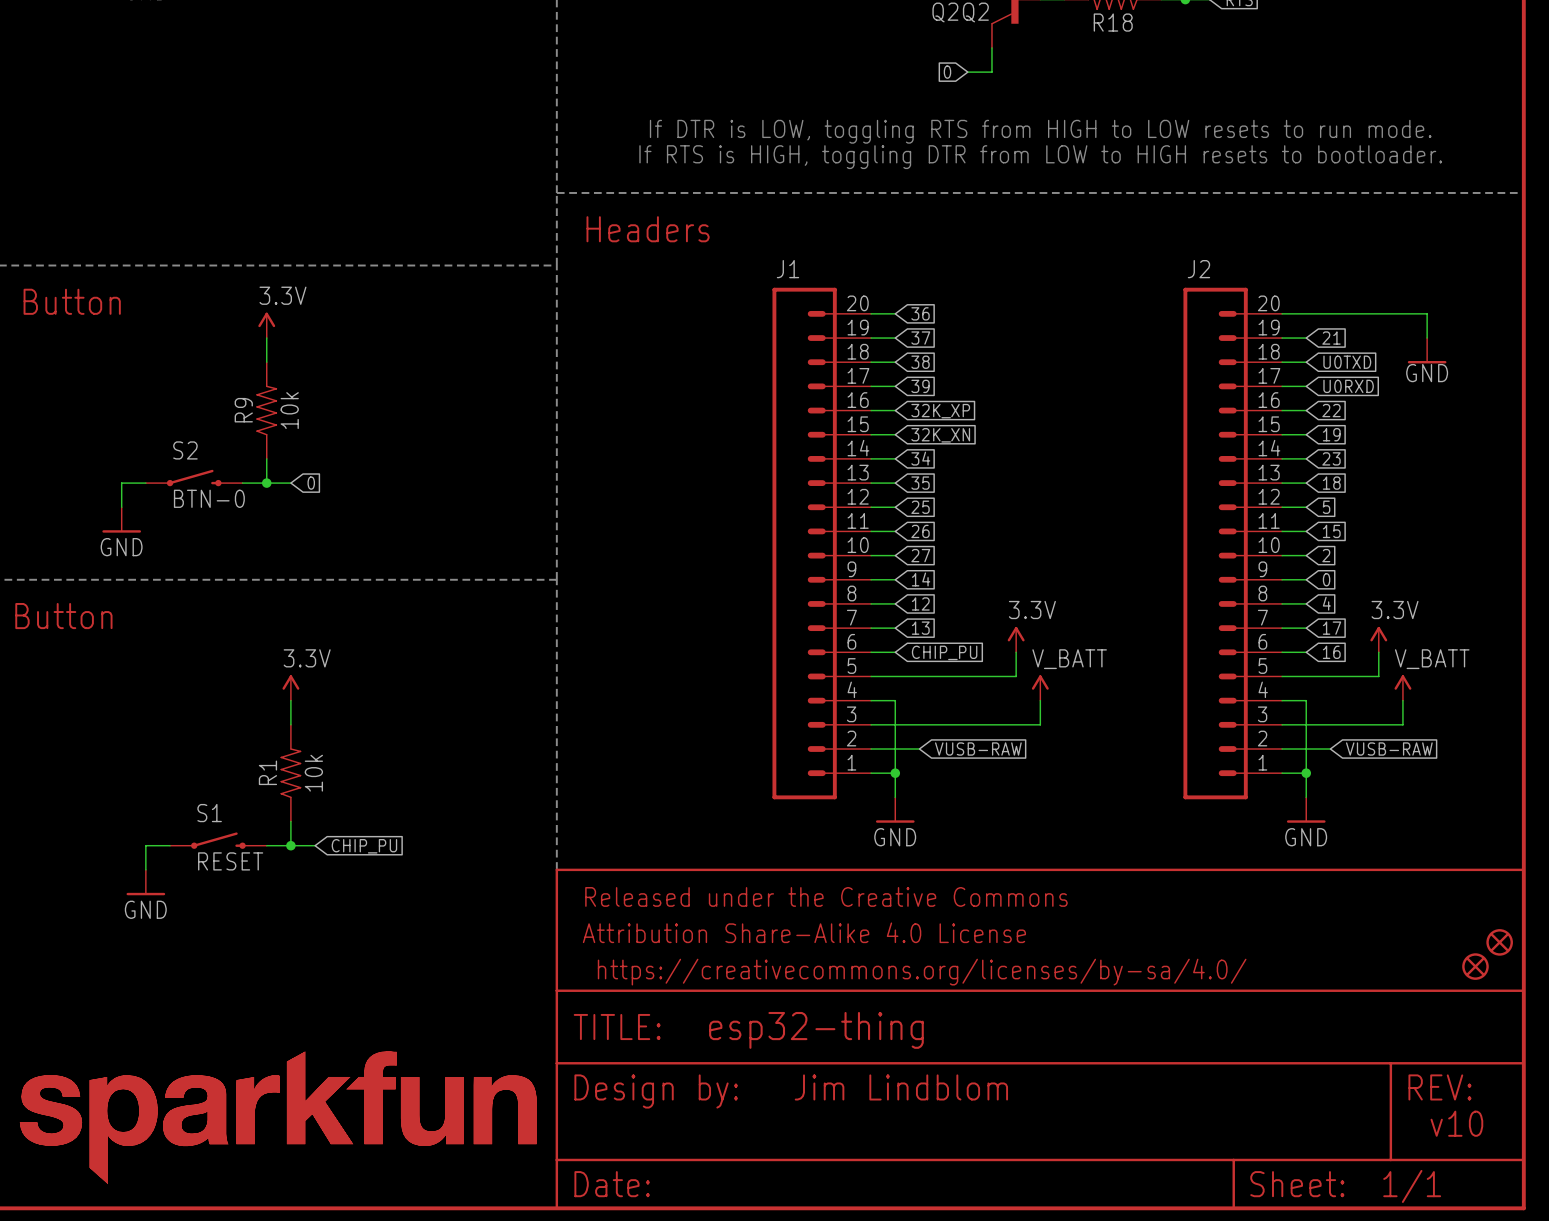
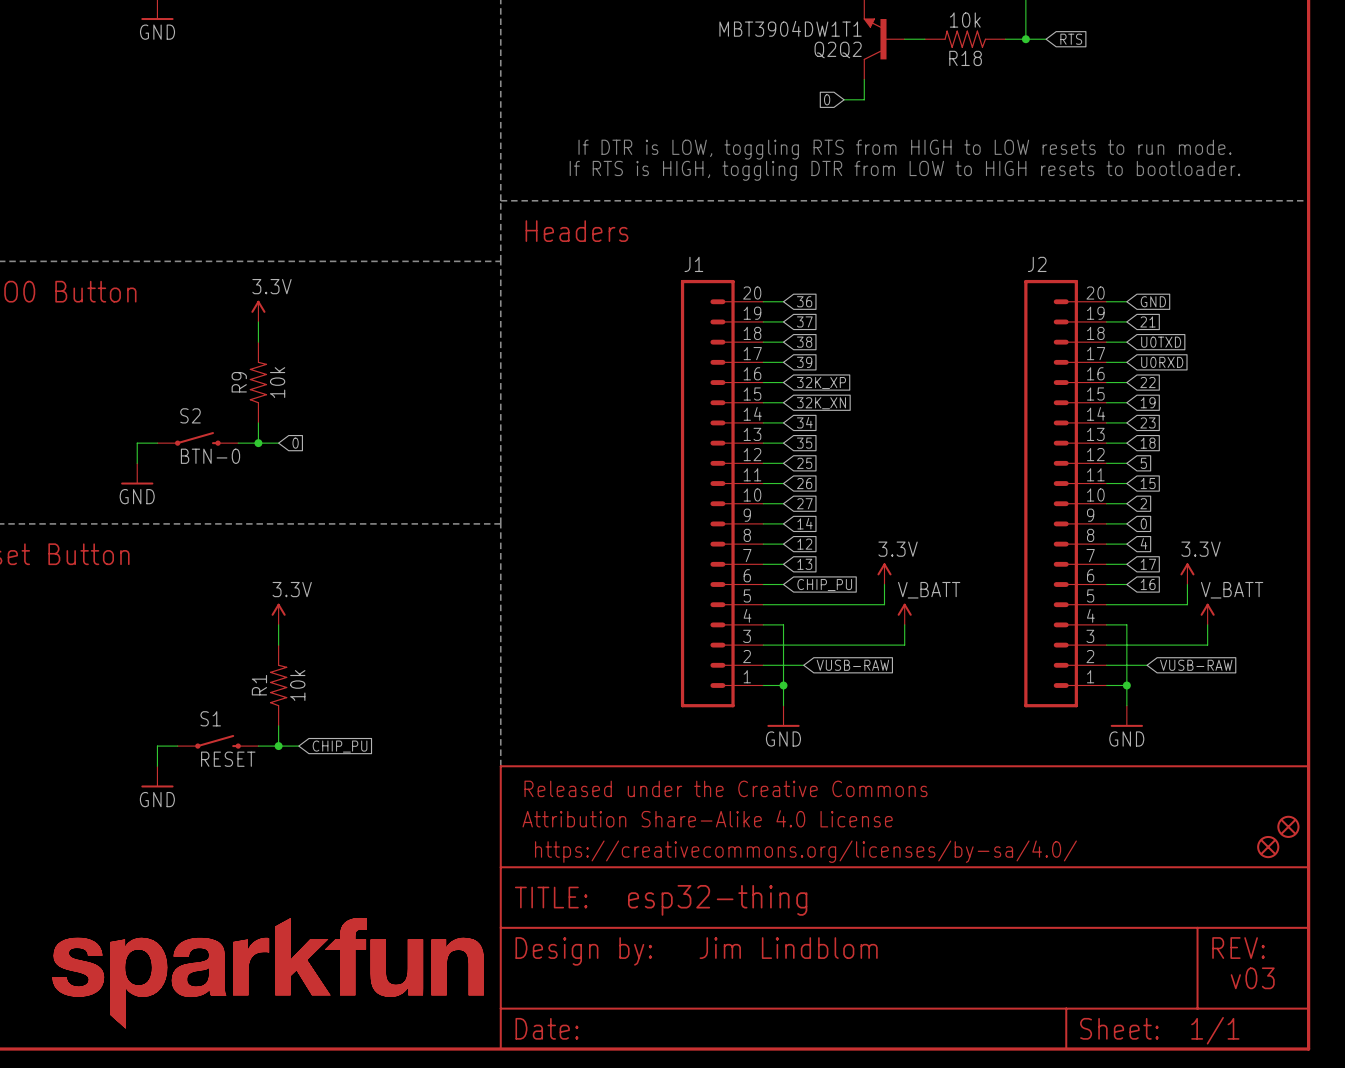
wire: (1306, 313) (1427, 313) (1427, 338) -> none
global label: none -> GND (1153, 301)
power symbol: GND (1427, 350) -> none
text: v10 (1456, 1123) -> v03 (1252, 978)

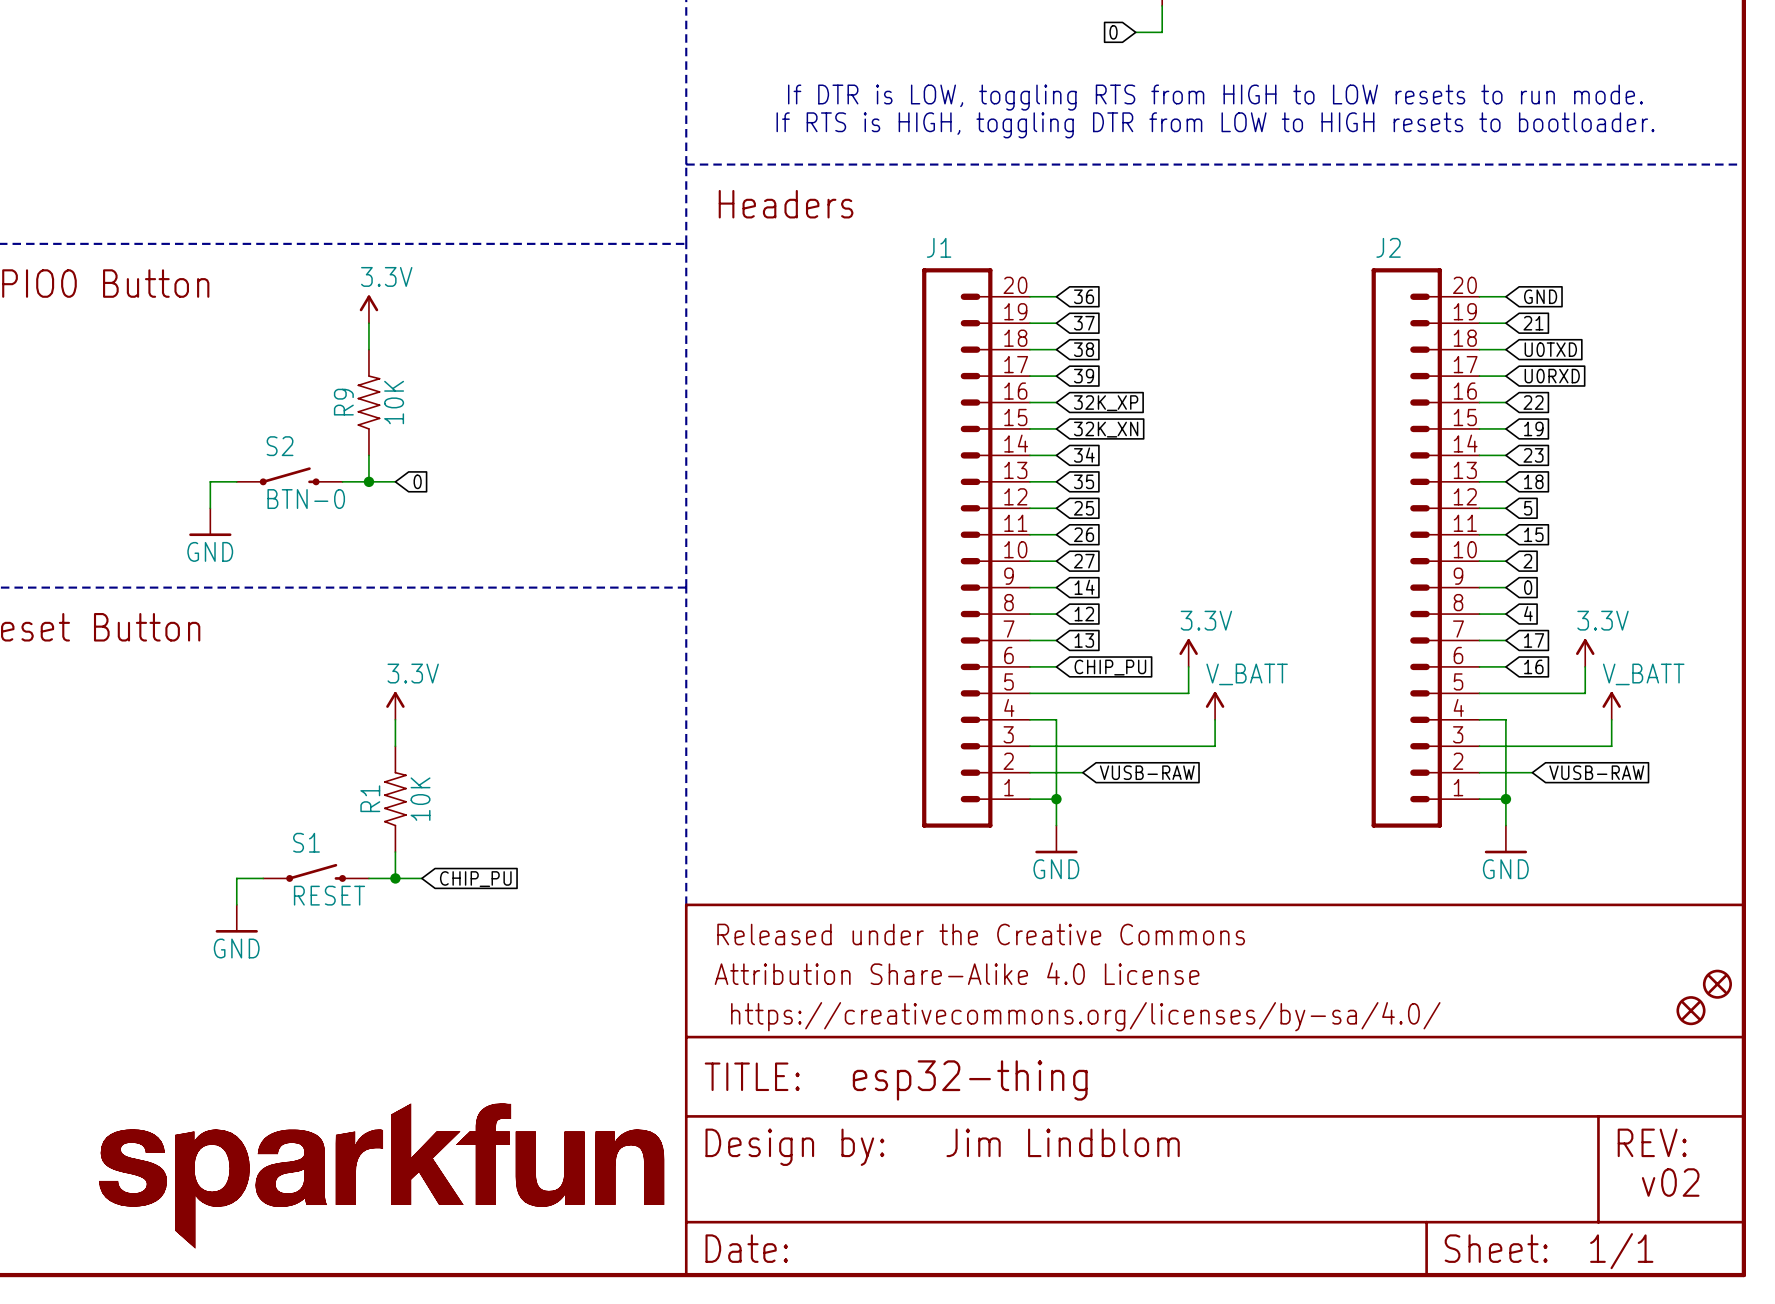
R9 value: 10k (277, 382) -> 10K (394, 402)
R1 value: 10k (297, 685) -> 10K (420, 799)
text: v03 (1252, 978) -> v02 (1670, 1182)

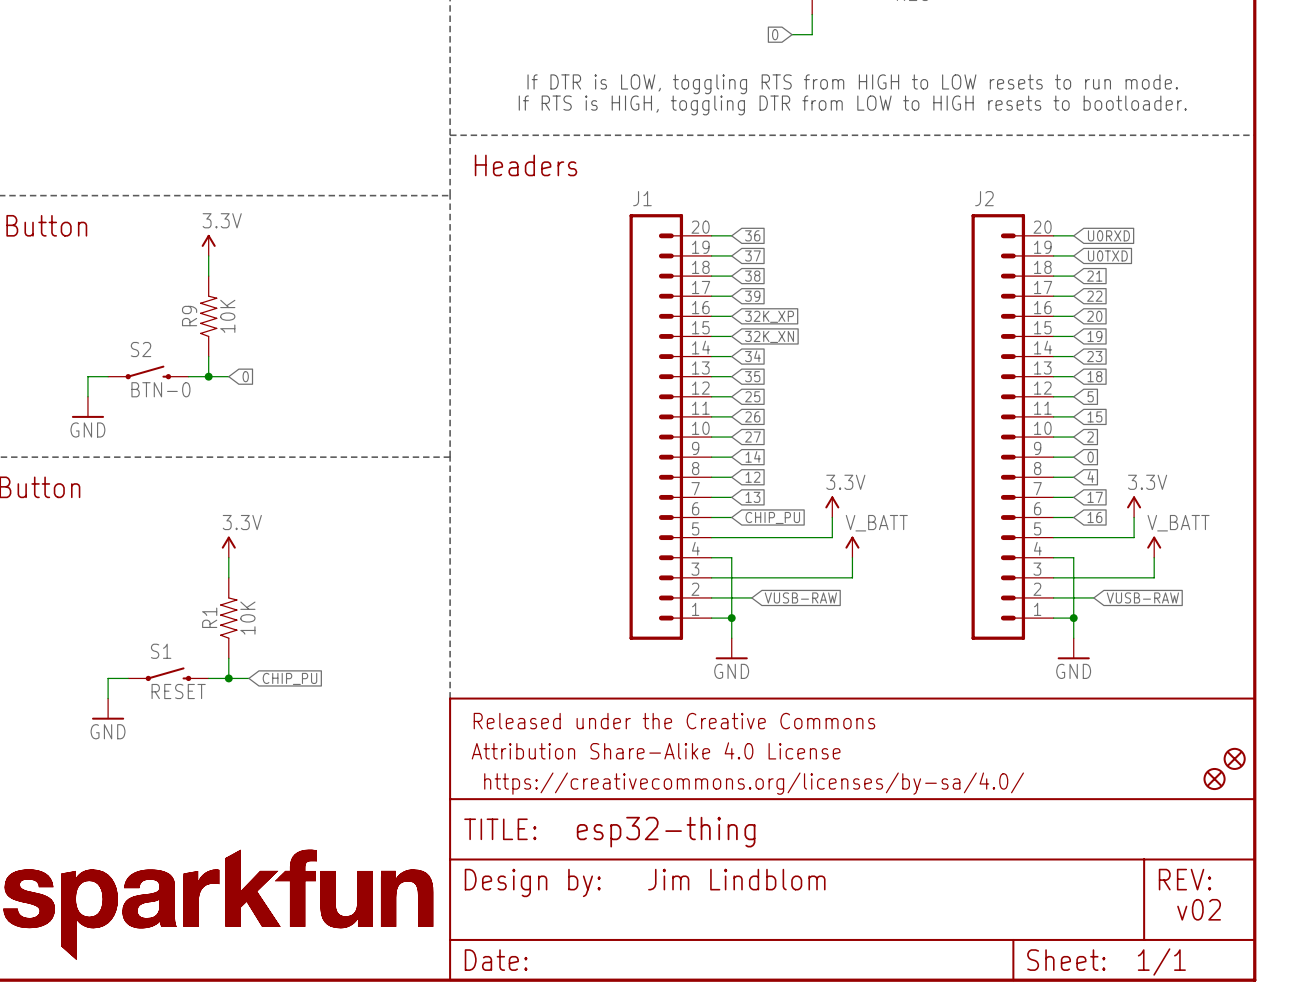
global label: GND (1540, 296) -> U0RXD (1108, 235)
global label: 21 (1533, 323) -> U0TXD (1107, 255)
global label: U0TXD (1550, 349) -> 21 (1094, 276)
global label: U0RXD (1552, 376) -> 22 (1094, 296)
global label: 22 (1533, 402) -> 20 (1094, 316)

